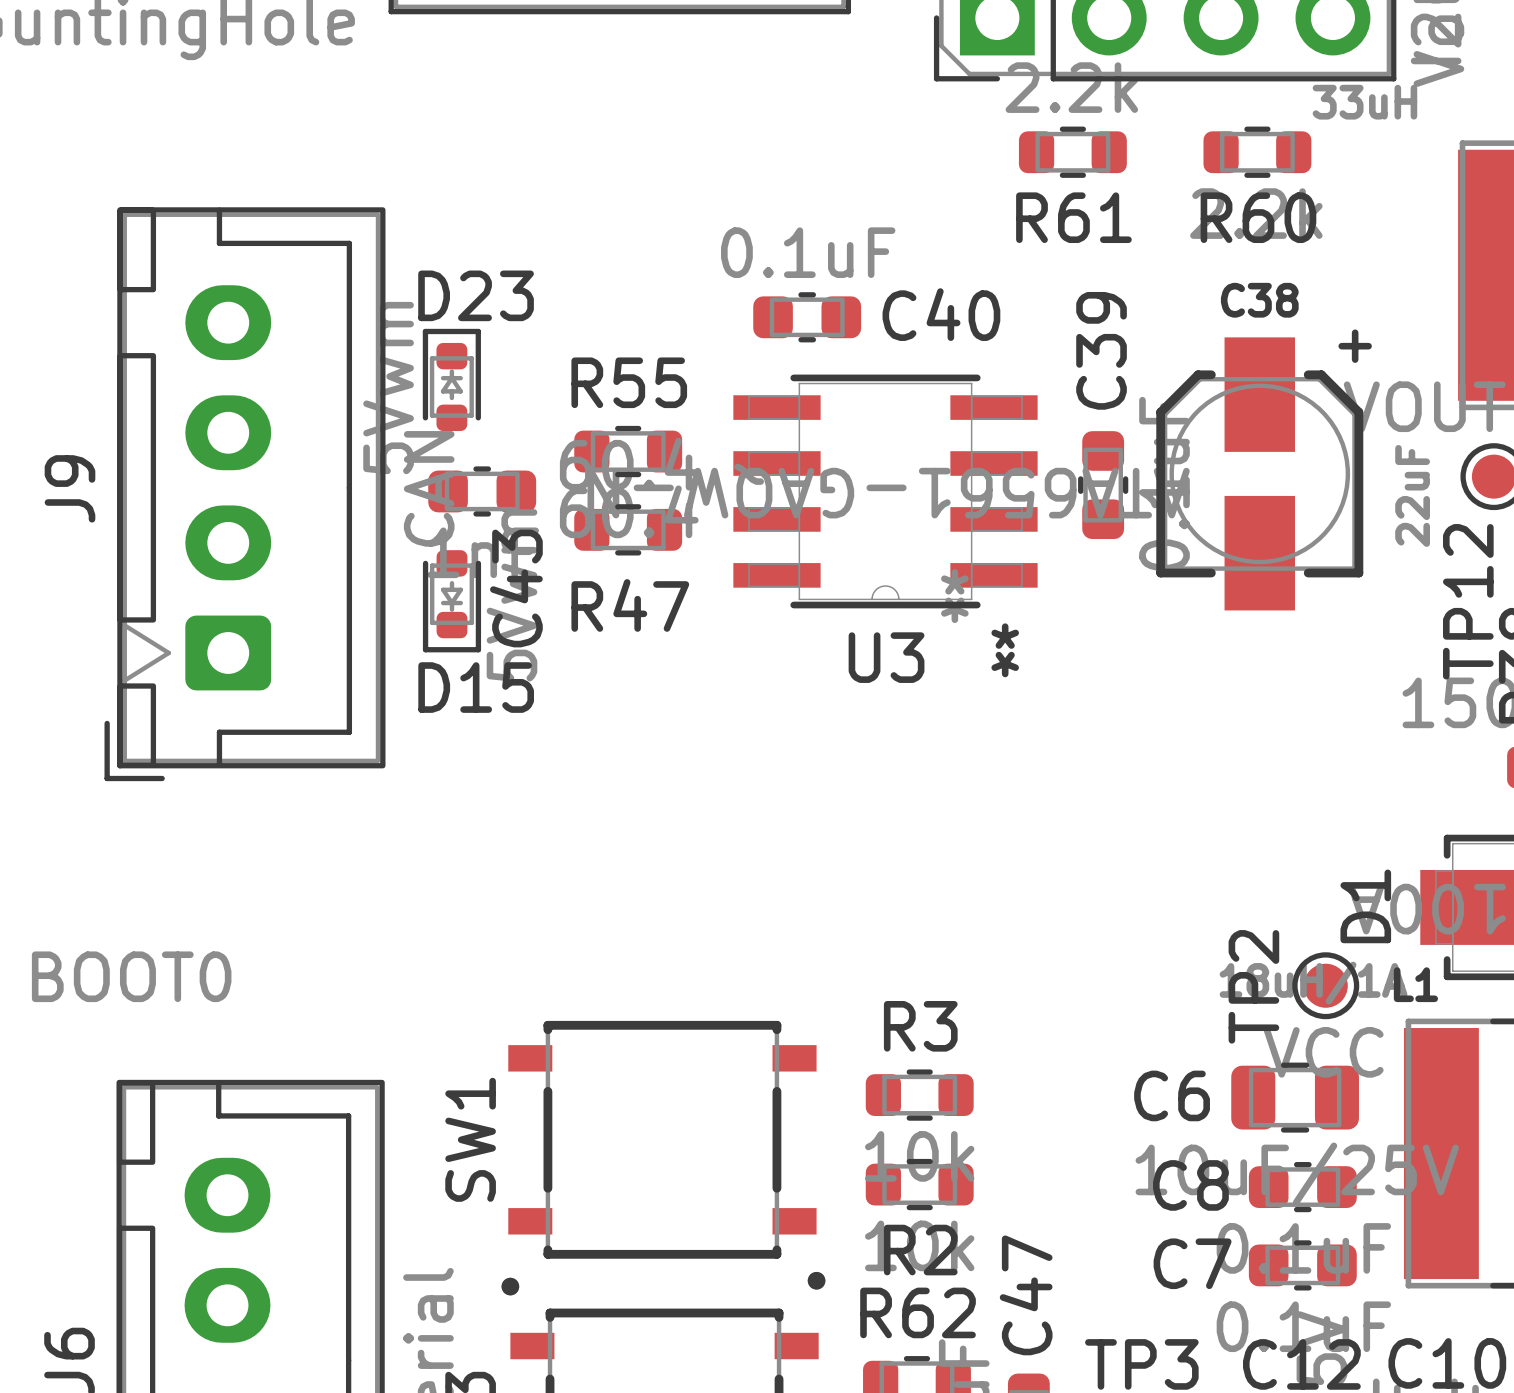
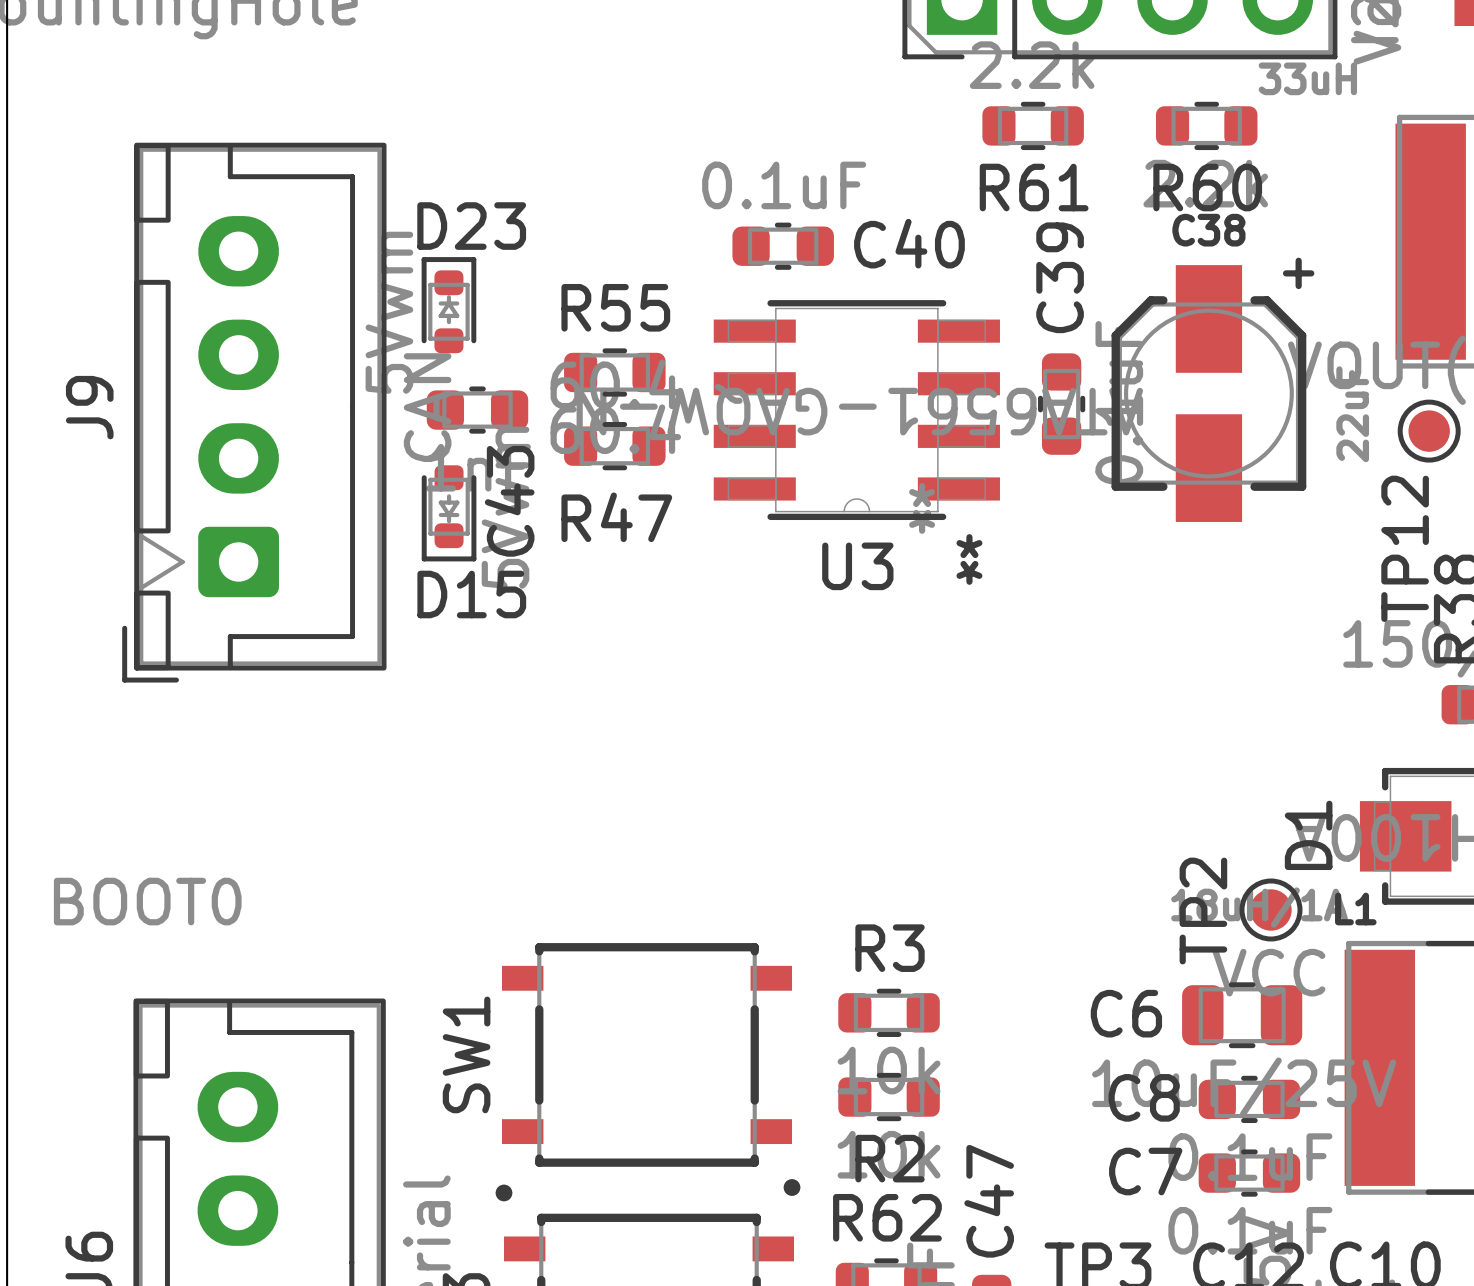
C40 position: (807, 317) -> (783, 246)
D23 position: (451, 379) -> (448, 305)
R55 position: (628, 451) -> (614, 372)
C38 position: (1259, 473) -> (1208, 393)
C39 position: (1103, 485) -> (1061, 404)
C43 position: (482, 491) -> (477, 410)
U3 position: (885, 491) -> (856, 410)
J9 position: (244, 494) -> (254, 412)
R47 position: (628, 529) -> (614, 446)
D15 position: (451, 601) -> (449, 513)

